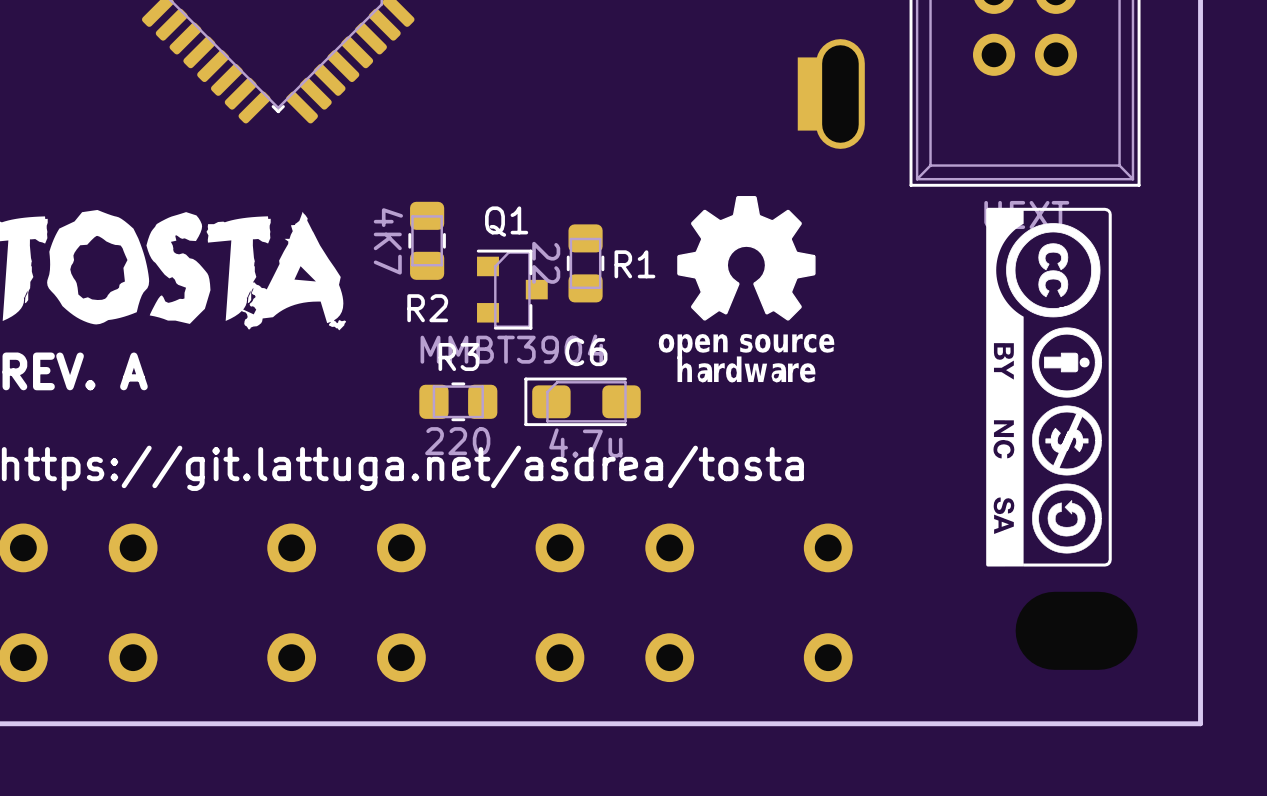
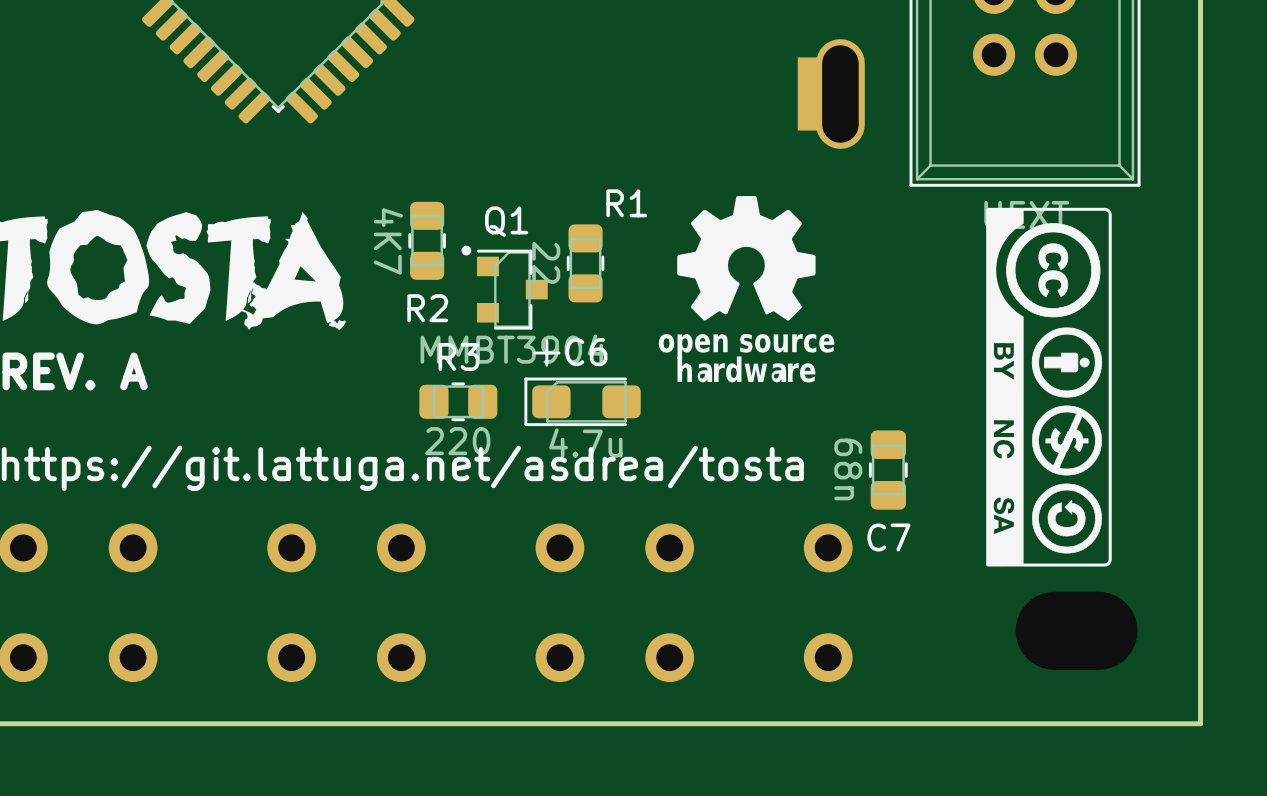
drawing: none -> [461, 245, 472, 256]
R1 name position: R1 (634, 264) -> R1 (626, 203)
line: none -> (546, 340) (546, 365)
line: none -> (559, 353) (534, 353)
C7: none -> 68n (888, 470)

